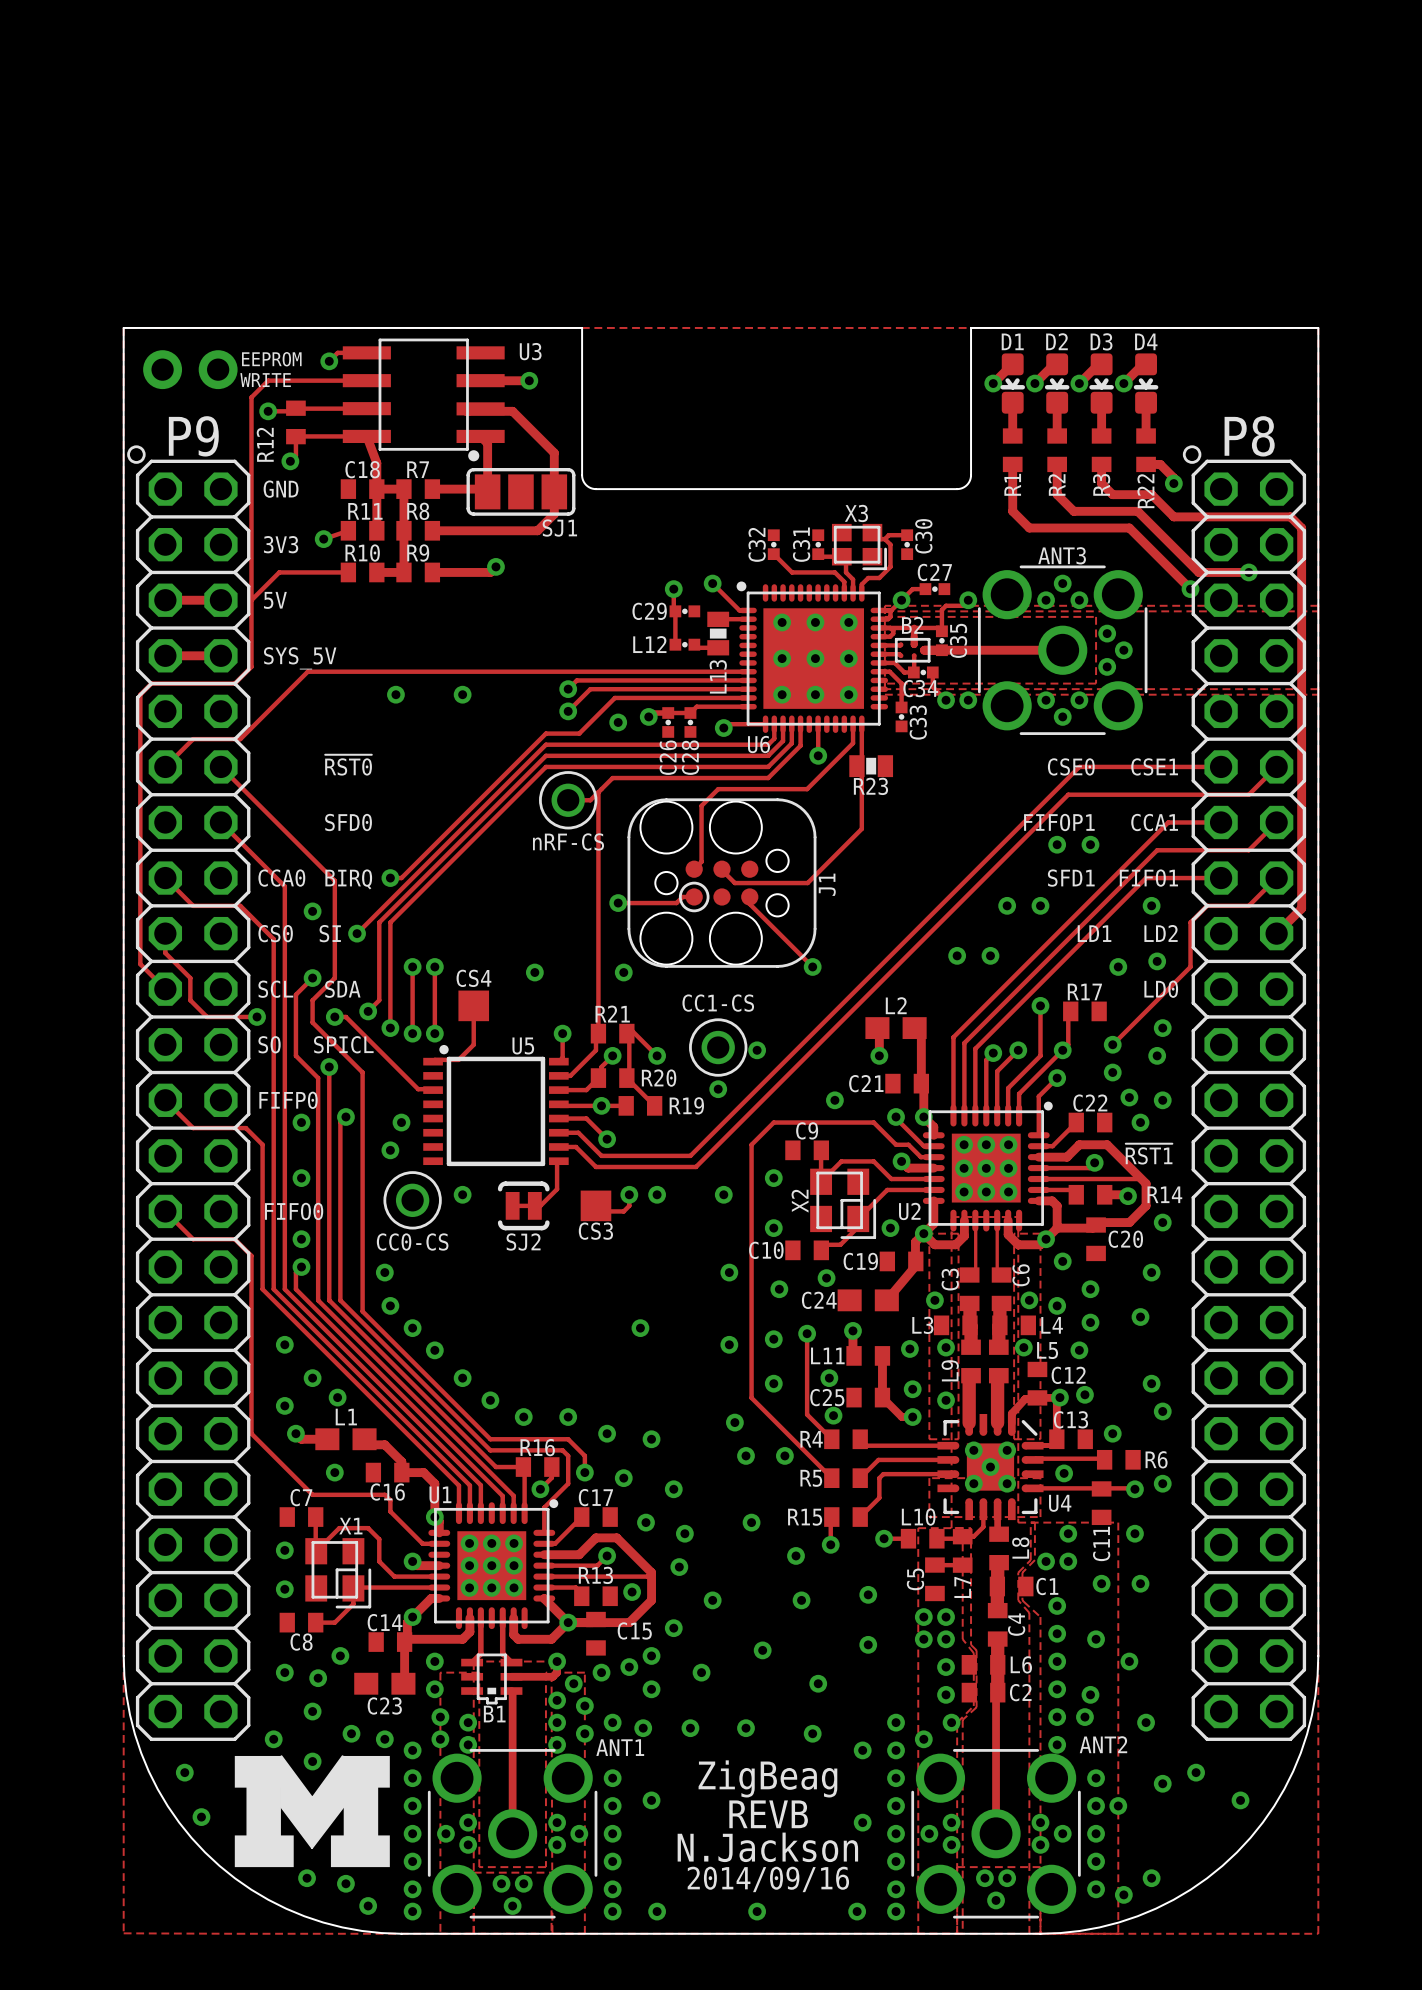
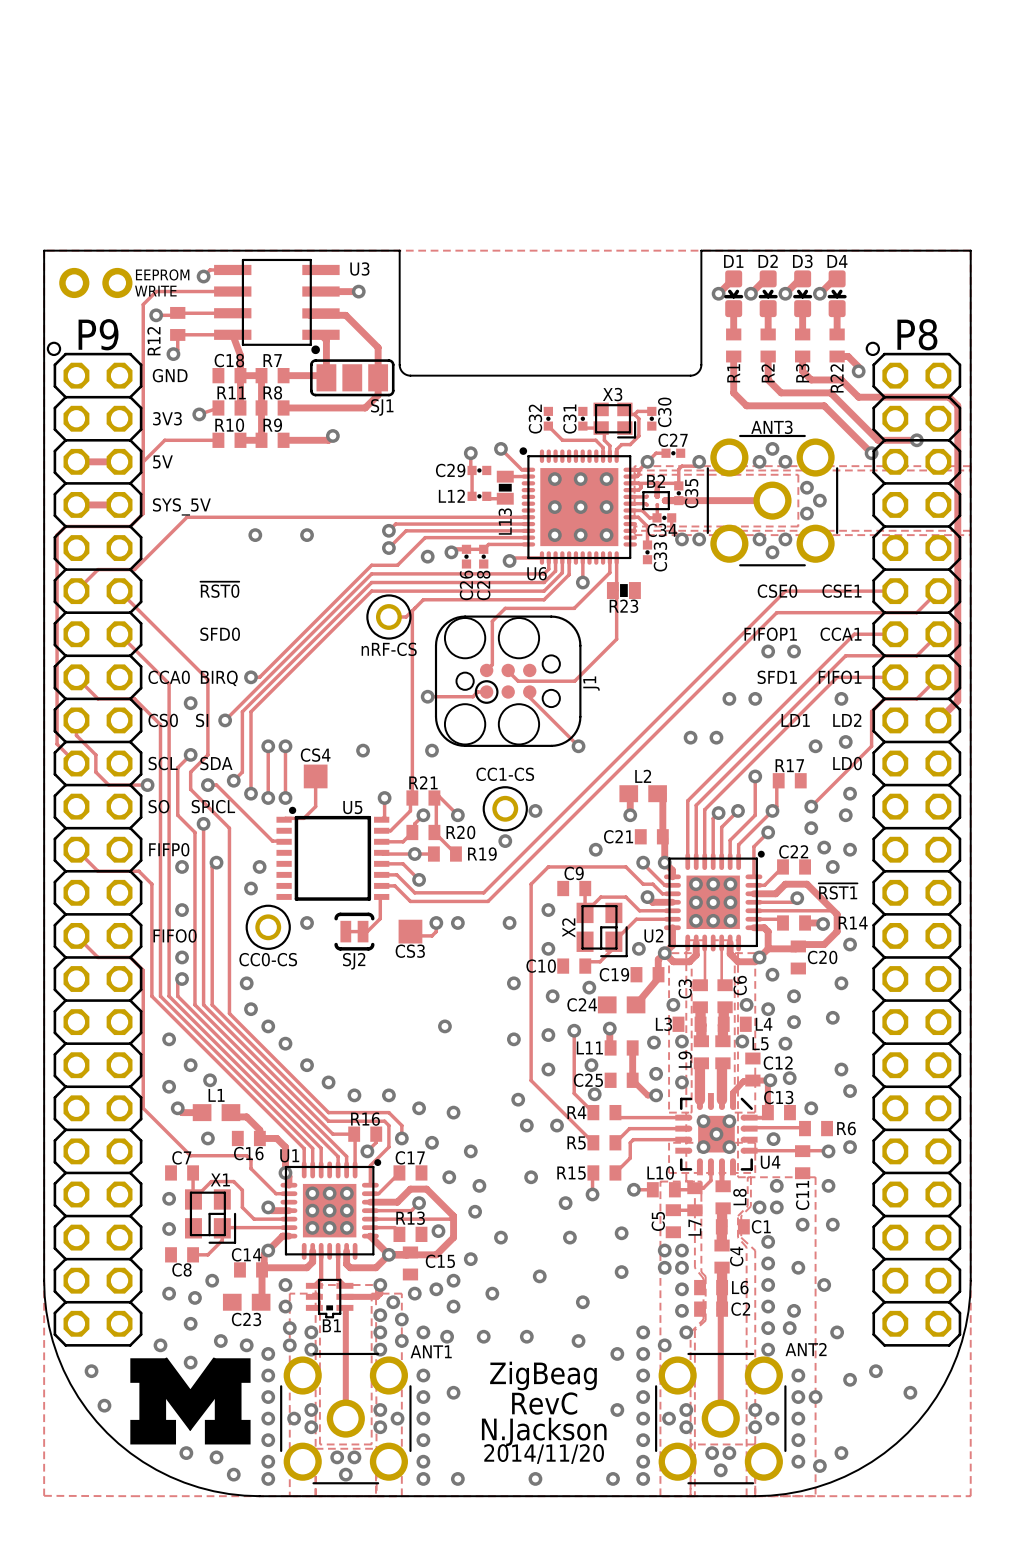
text: REVB (768, 1814) -> RevC (544, 1403)
text: 2014/09/16 (768, 1879) -> 2014/11/20 (544, 1454)

